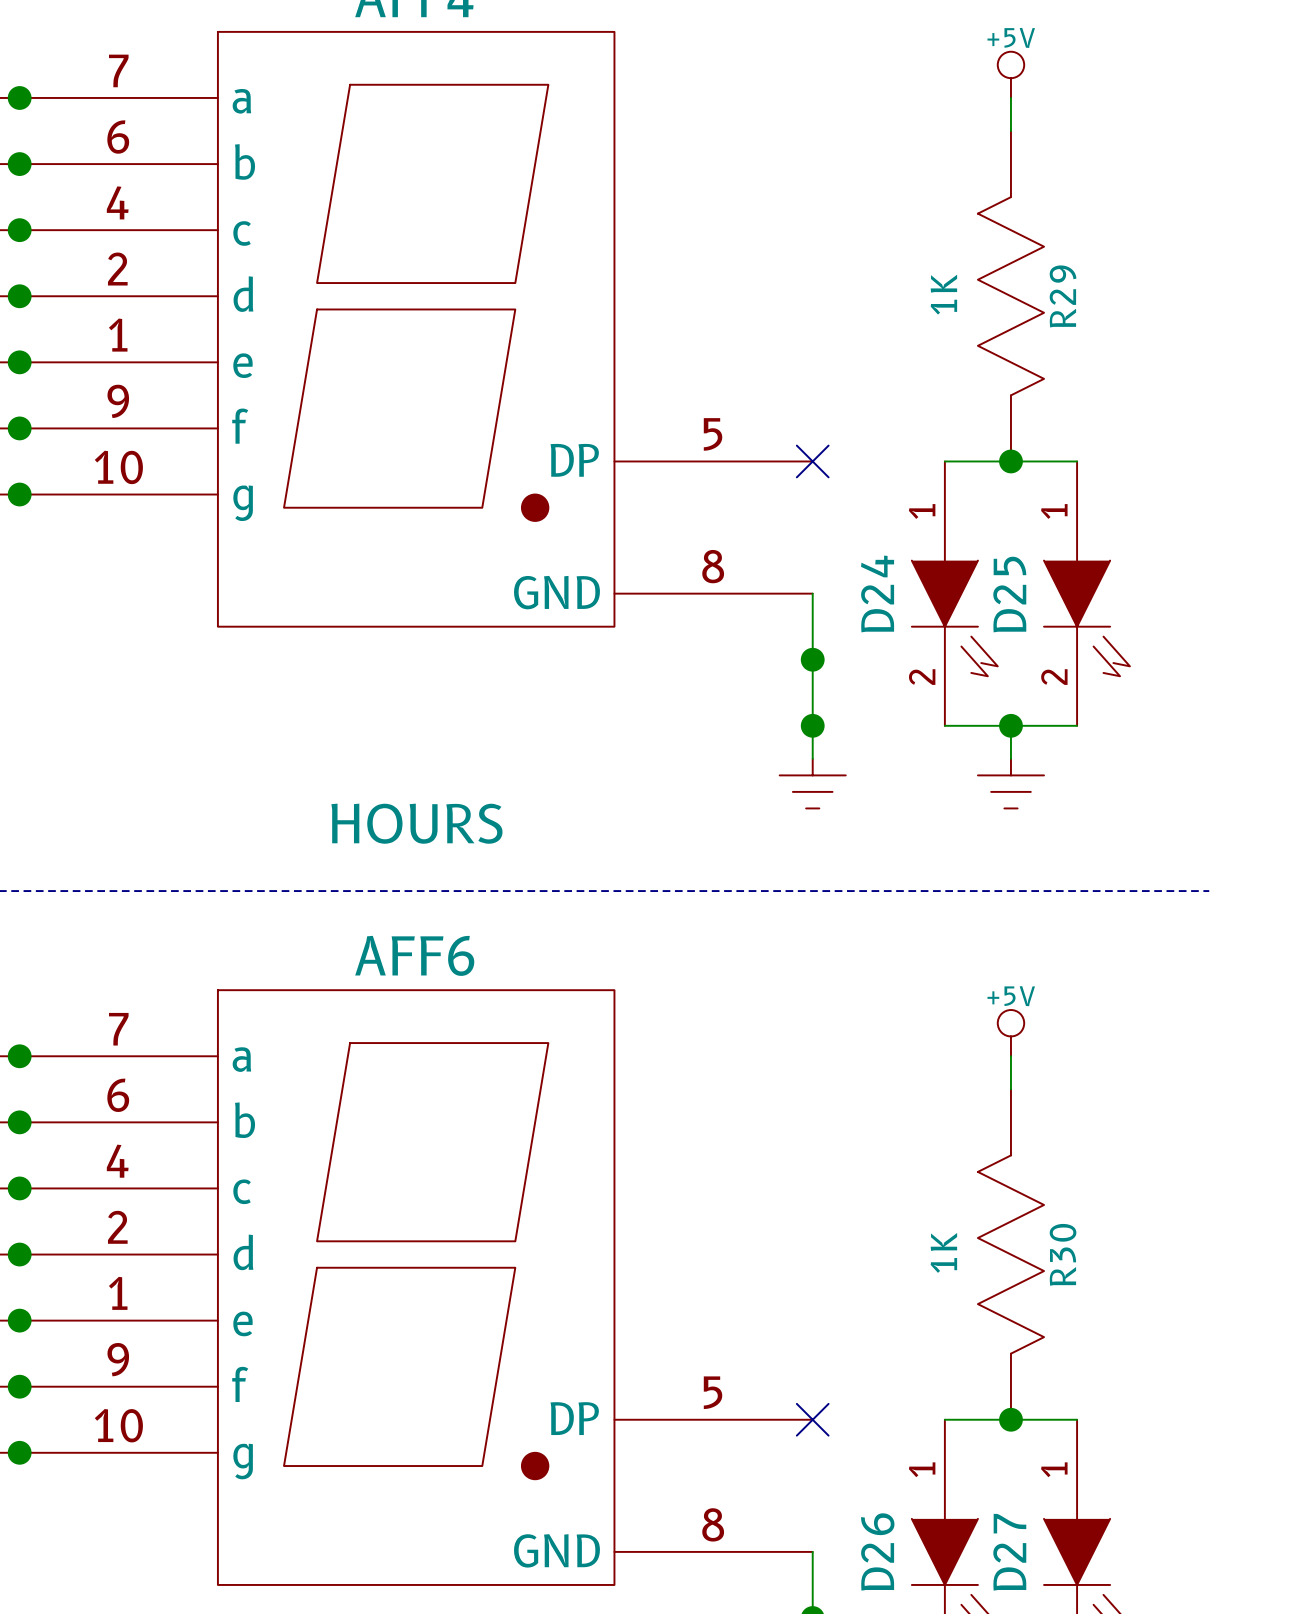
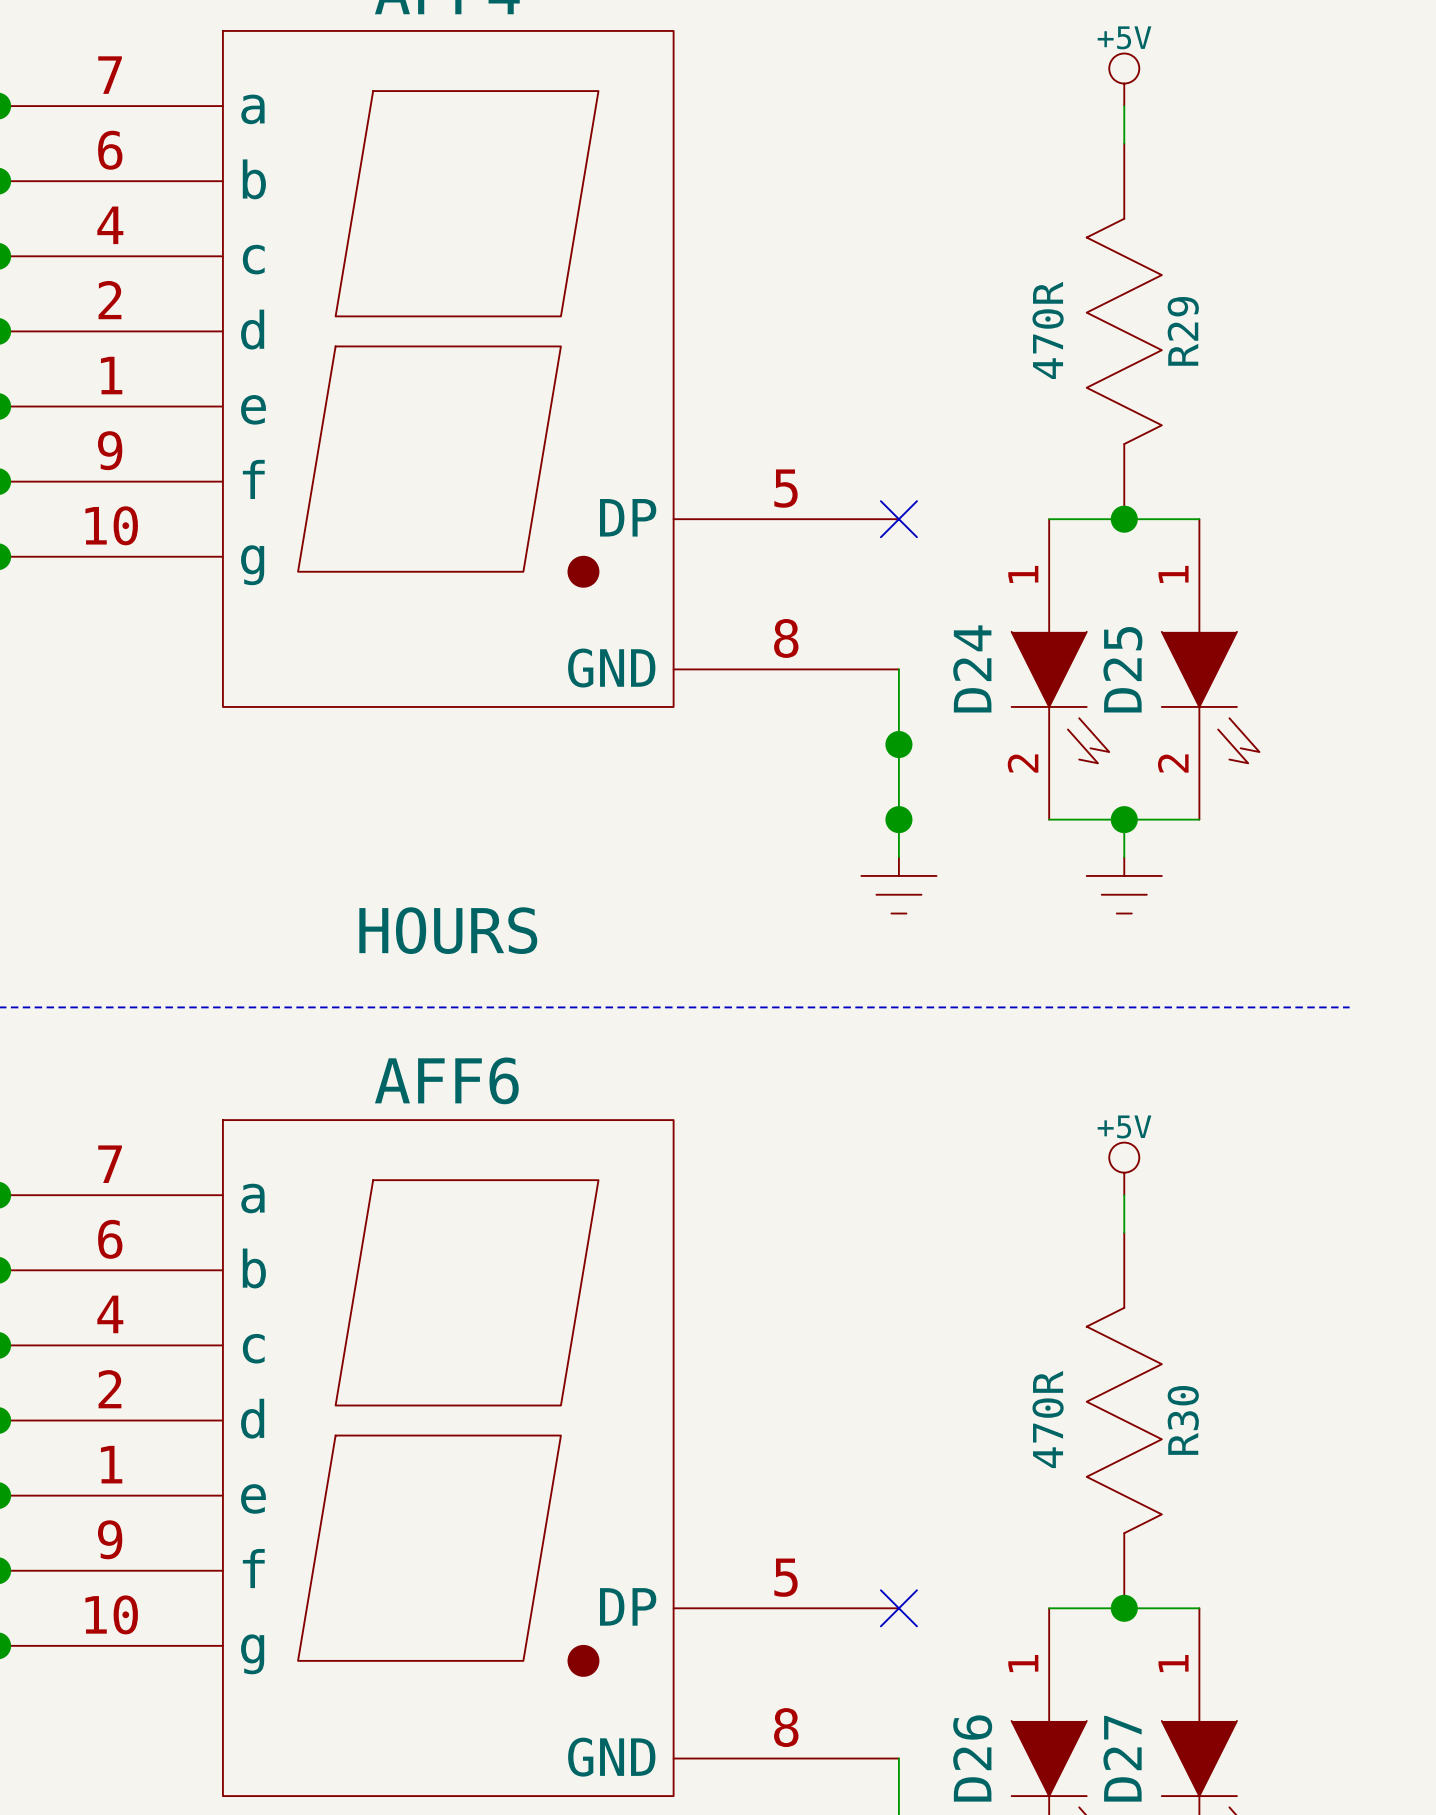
R29 value: 1K (943, 294) -> 470R (1048, 330)
R30 value: 1K (943, 1252) -> 470R (1048, 1419)

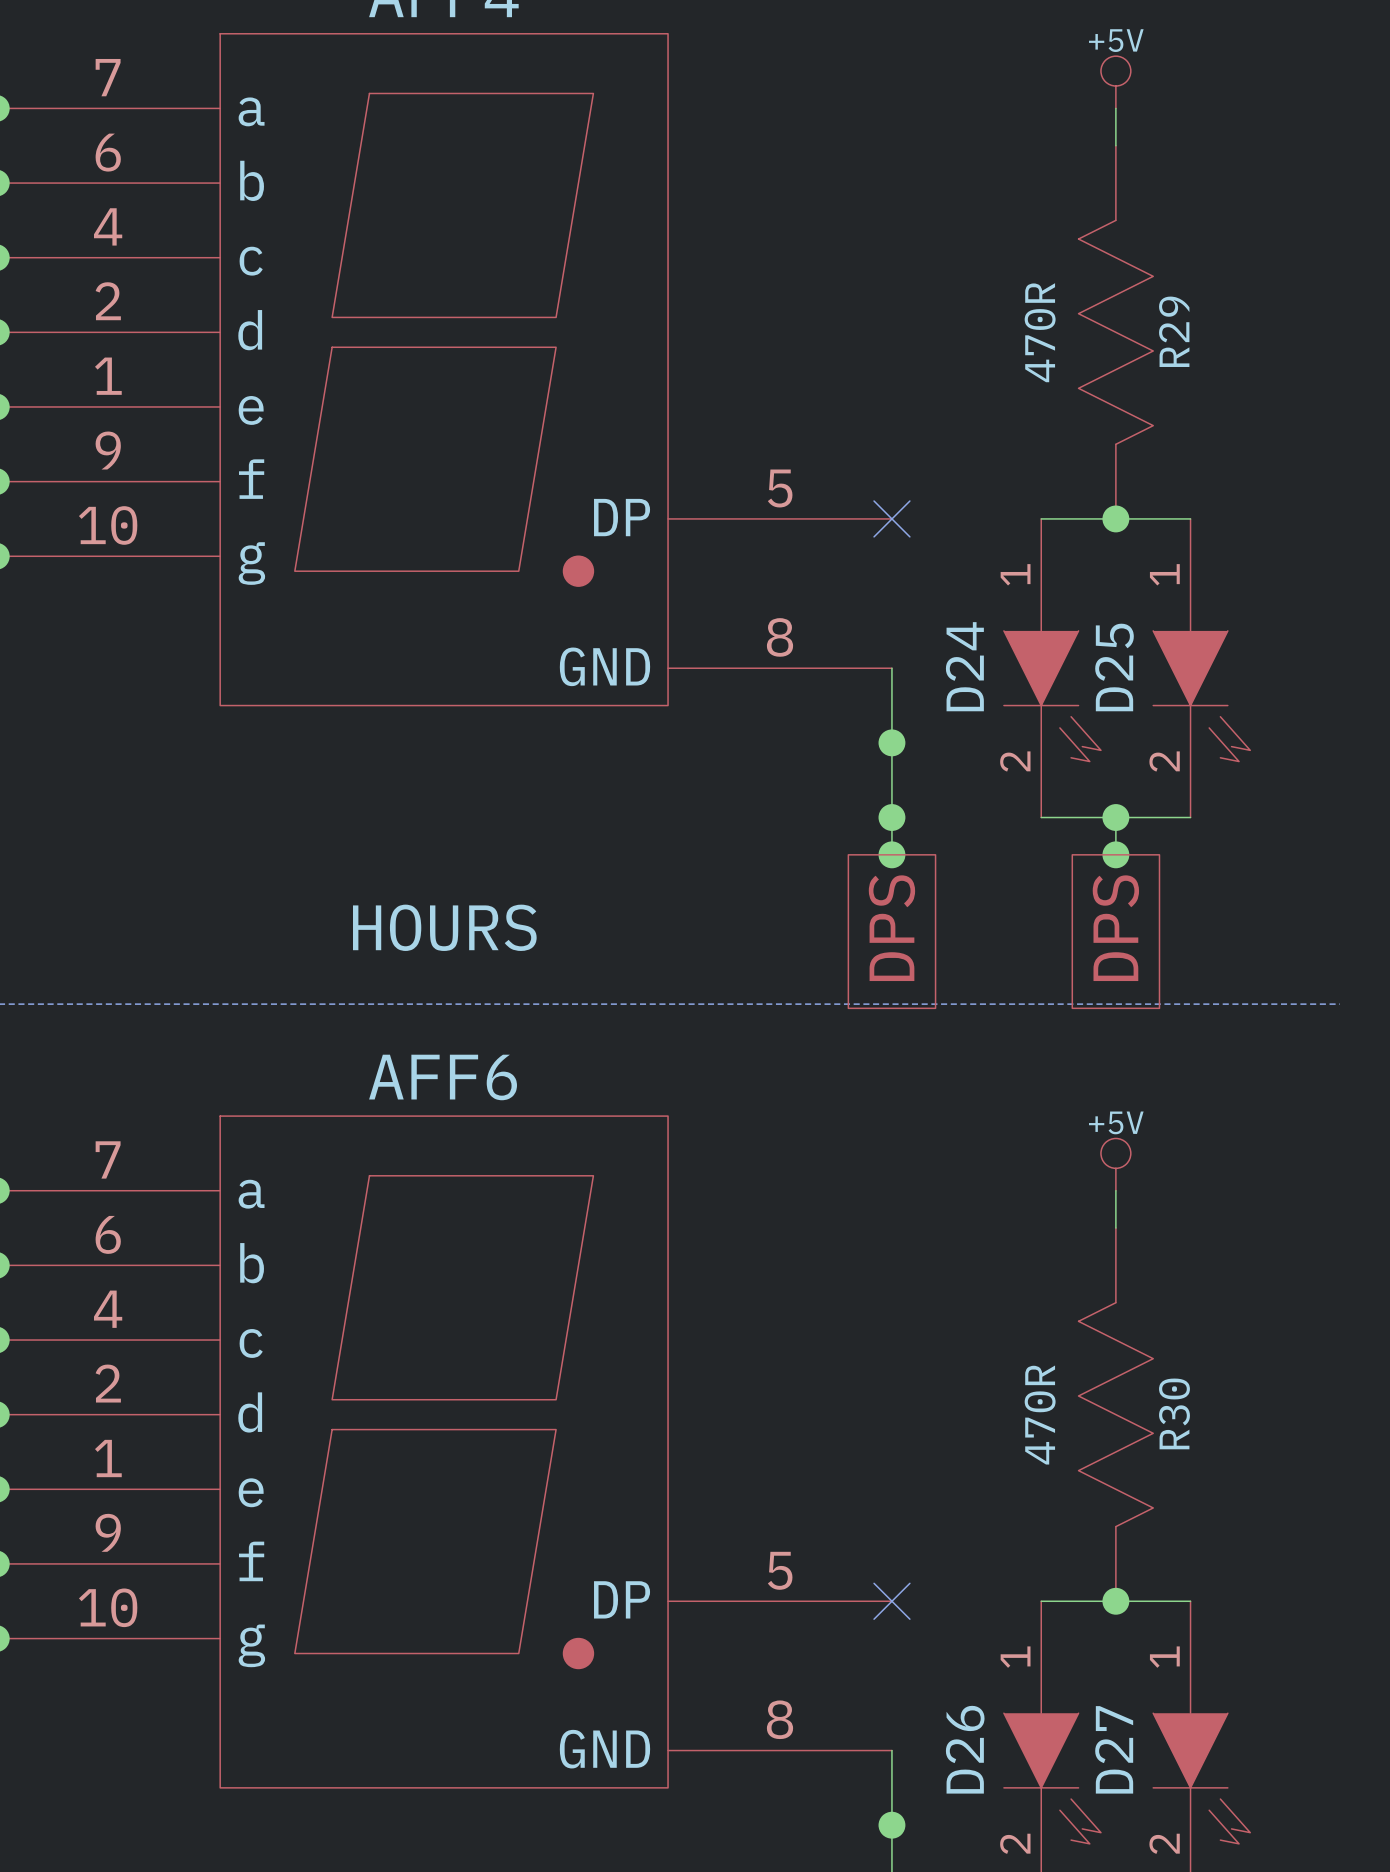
junction: none -> (891, 854)
junction: none -> (1115, 854)
power symbol: (898, 885) -> none
power symbol: (1124, 885) -> none
global label: none -> DPS (891, 928)
global label: none -> DPS (1115, 928)

